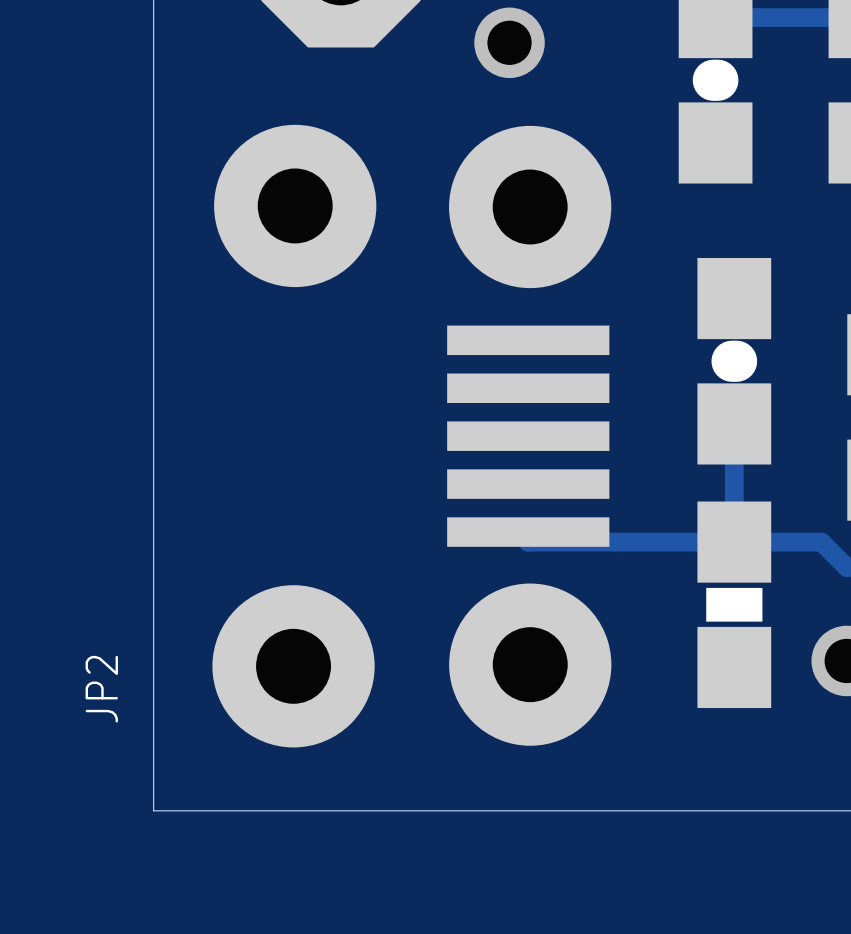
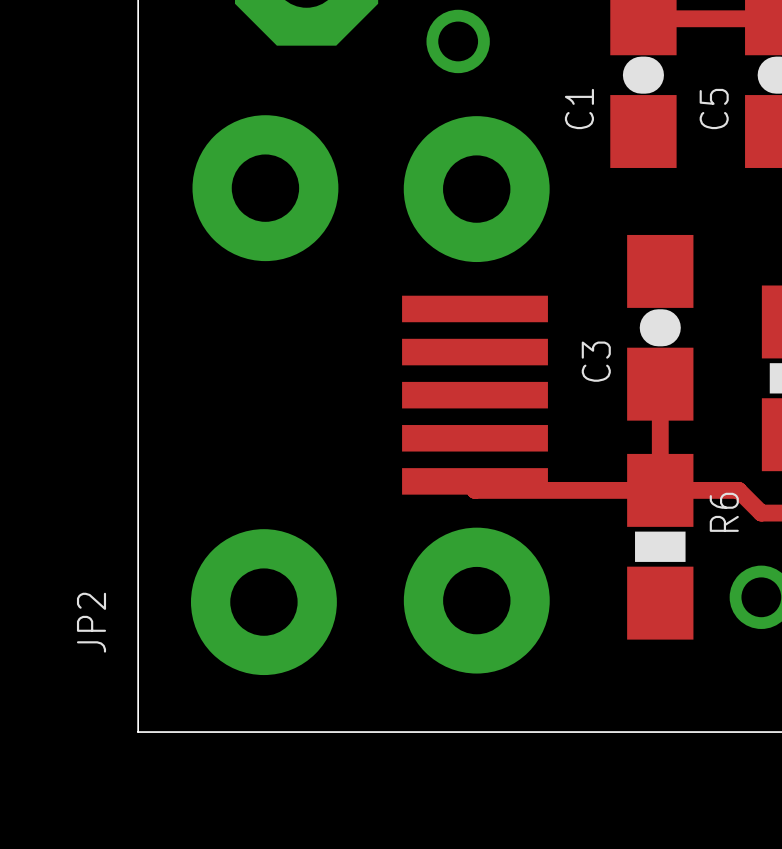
C1 name: none -> C1 (579, 109)
C5 name: none -> C5 (714, 109)
C3 name: none -> C3 (596, 361)
R6 name: none -> R6 (724, 512)

